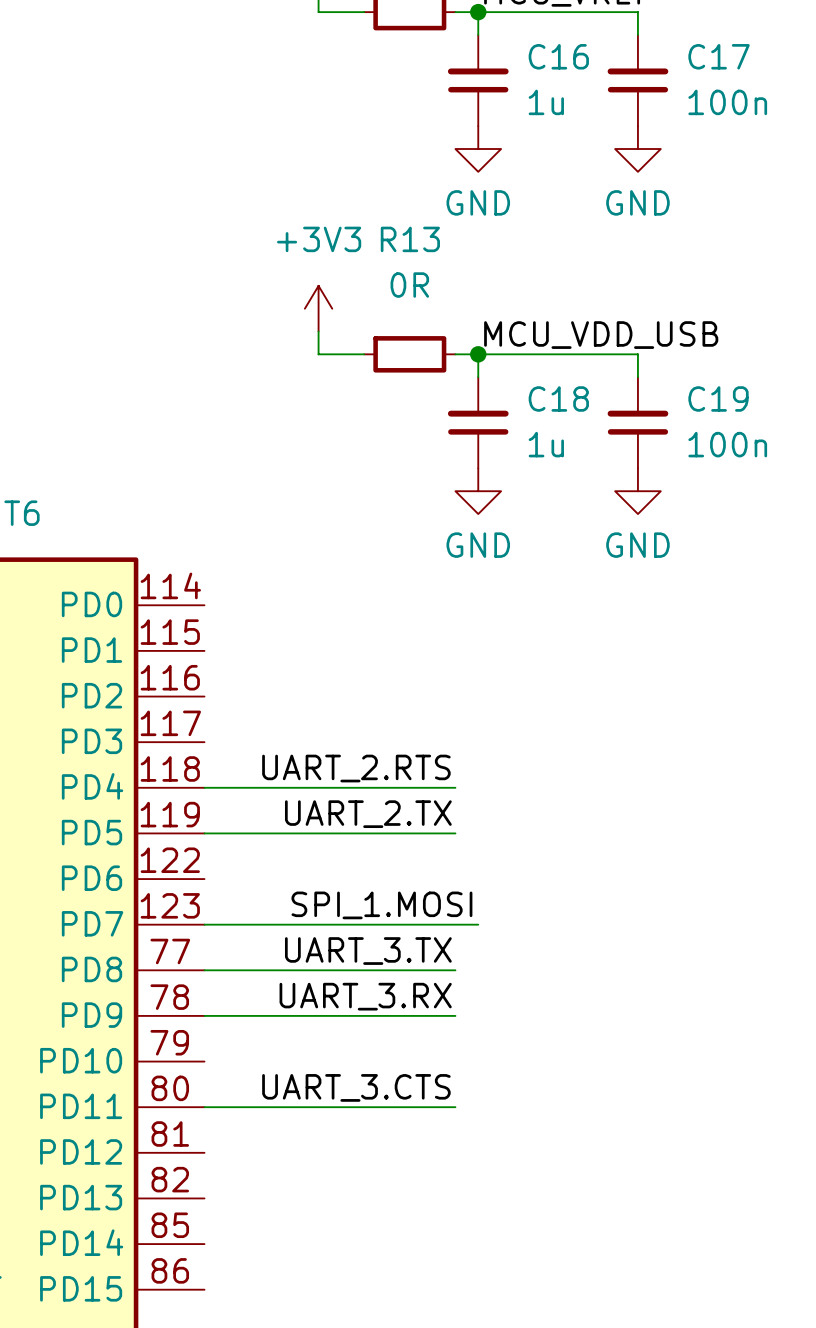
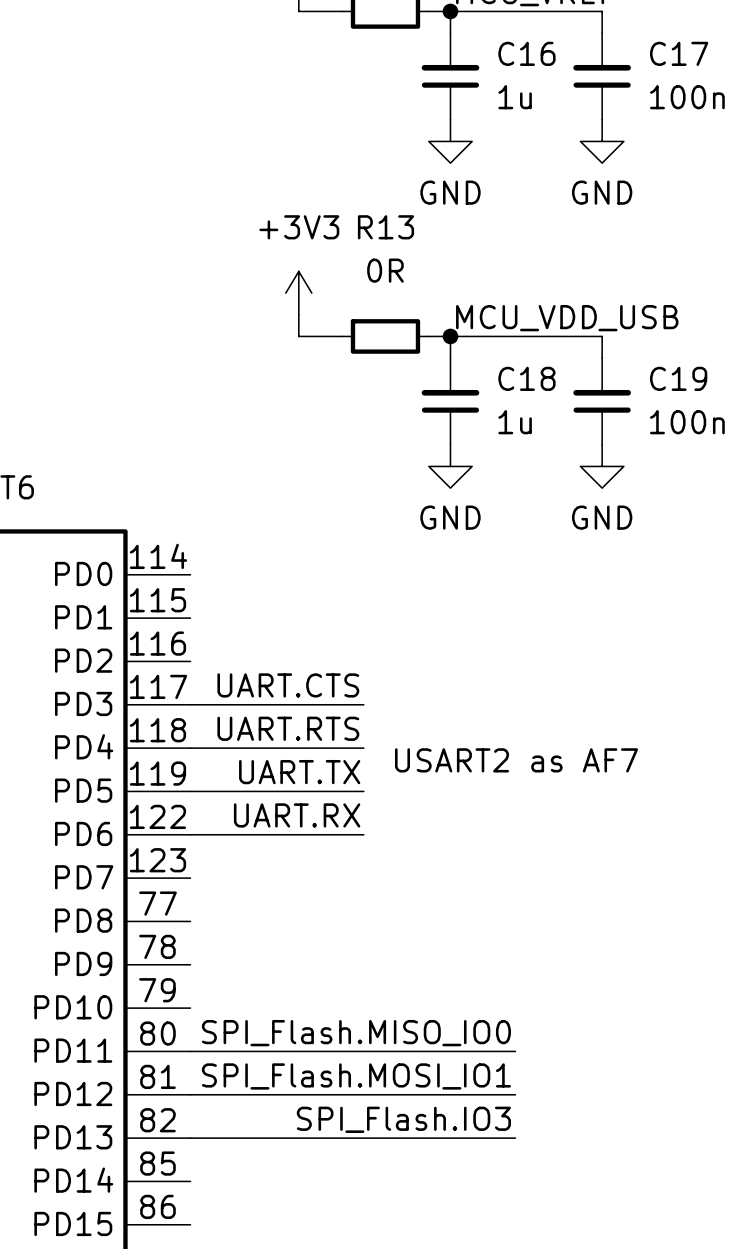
label: none -> UART.CTS (288, 685)
wire: none -> (190, 704) (363, 704)
label: none -> UART.RTS (288, 728)
label: UART_2.RTS (356, 768) -> none
wire: (387, 787) (455, 787) -> none
text: none -> USART2 as AF7 (516, 760)
label: none -> UART.TX (299, 772)
label: UART_2.TX (368, 814) -> none
wire: (387, 833) (455, 833) -> none
label: none -> UART.RX (297, 815)
wire: none -> (190, 834) (363, 834)
label: SPI_1.MOSI (381, 905) -> none
wire: (204, 924) (478, 924) -> none
label: UART_3.TX (368, 951) -> none
wire: (204, 970) (455, 970) -> none
label: UART_3.RX (365, 996) -> none
wire: (204, 1015) (455, 1015) -> none
label: UART_3.CTS (356, 1087) -> none
label: none -> SPI_Flash.MISO_IO0 (356, 1033)
wire: none -> (428, 1051) (515, 1051)
label: none -> SPI_Flash.MOSI_IO1 (356, 1076)
wire: none -> (190, 1094) (515, 1094)
label: none -> SPI_Flash.IO3 (403, 1119)
wire: none -> (190, 1138) (515, 1138)

